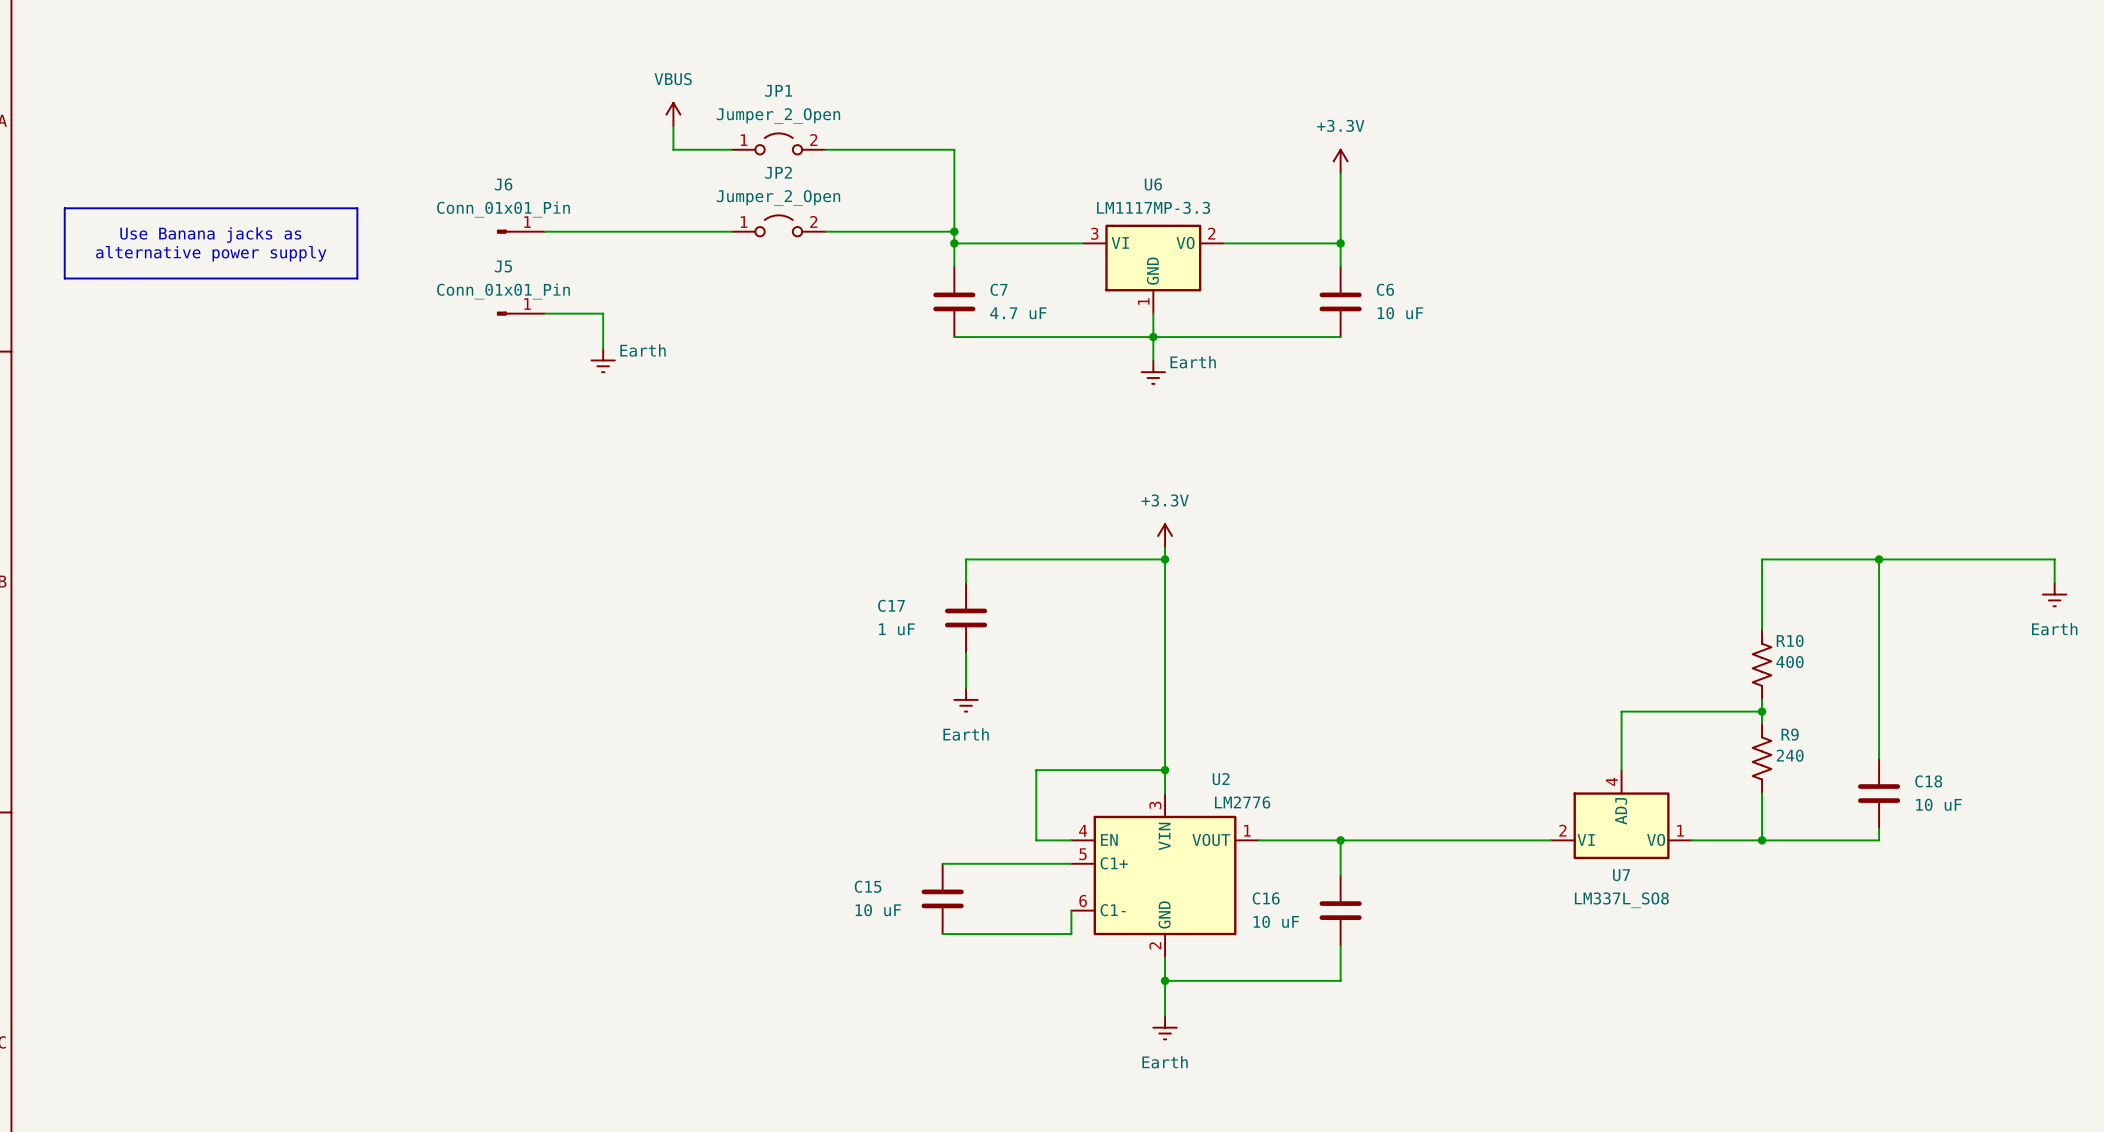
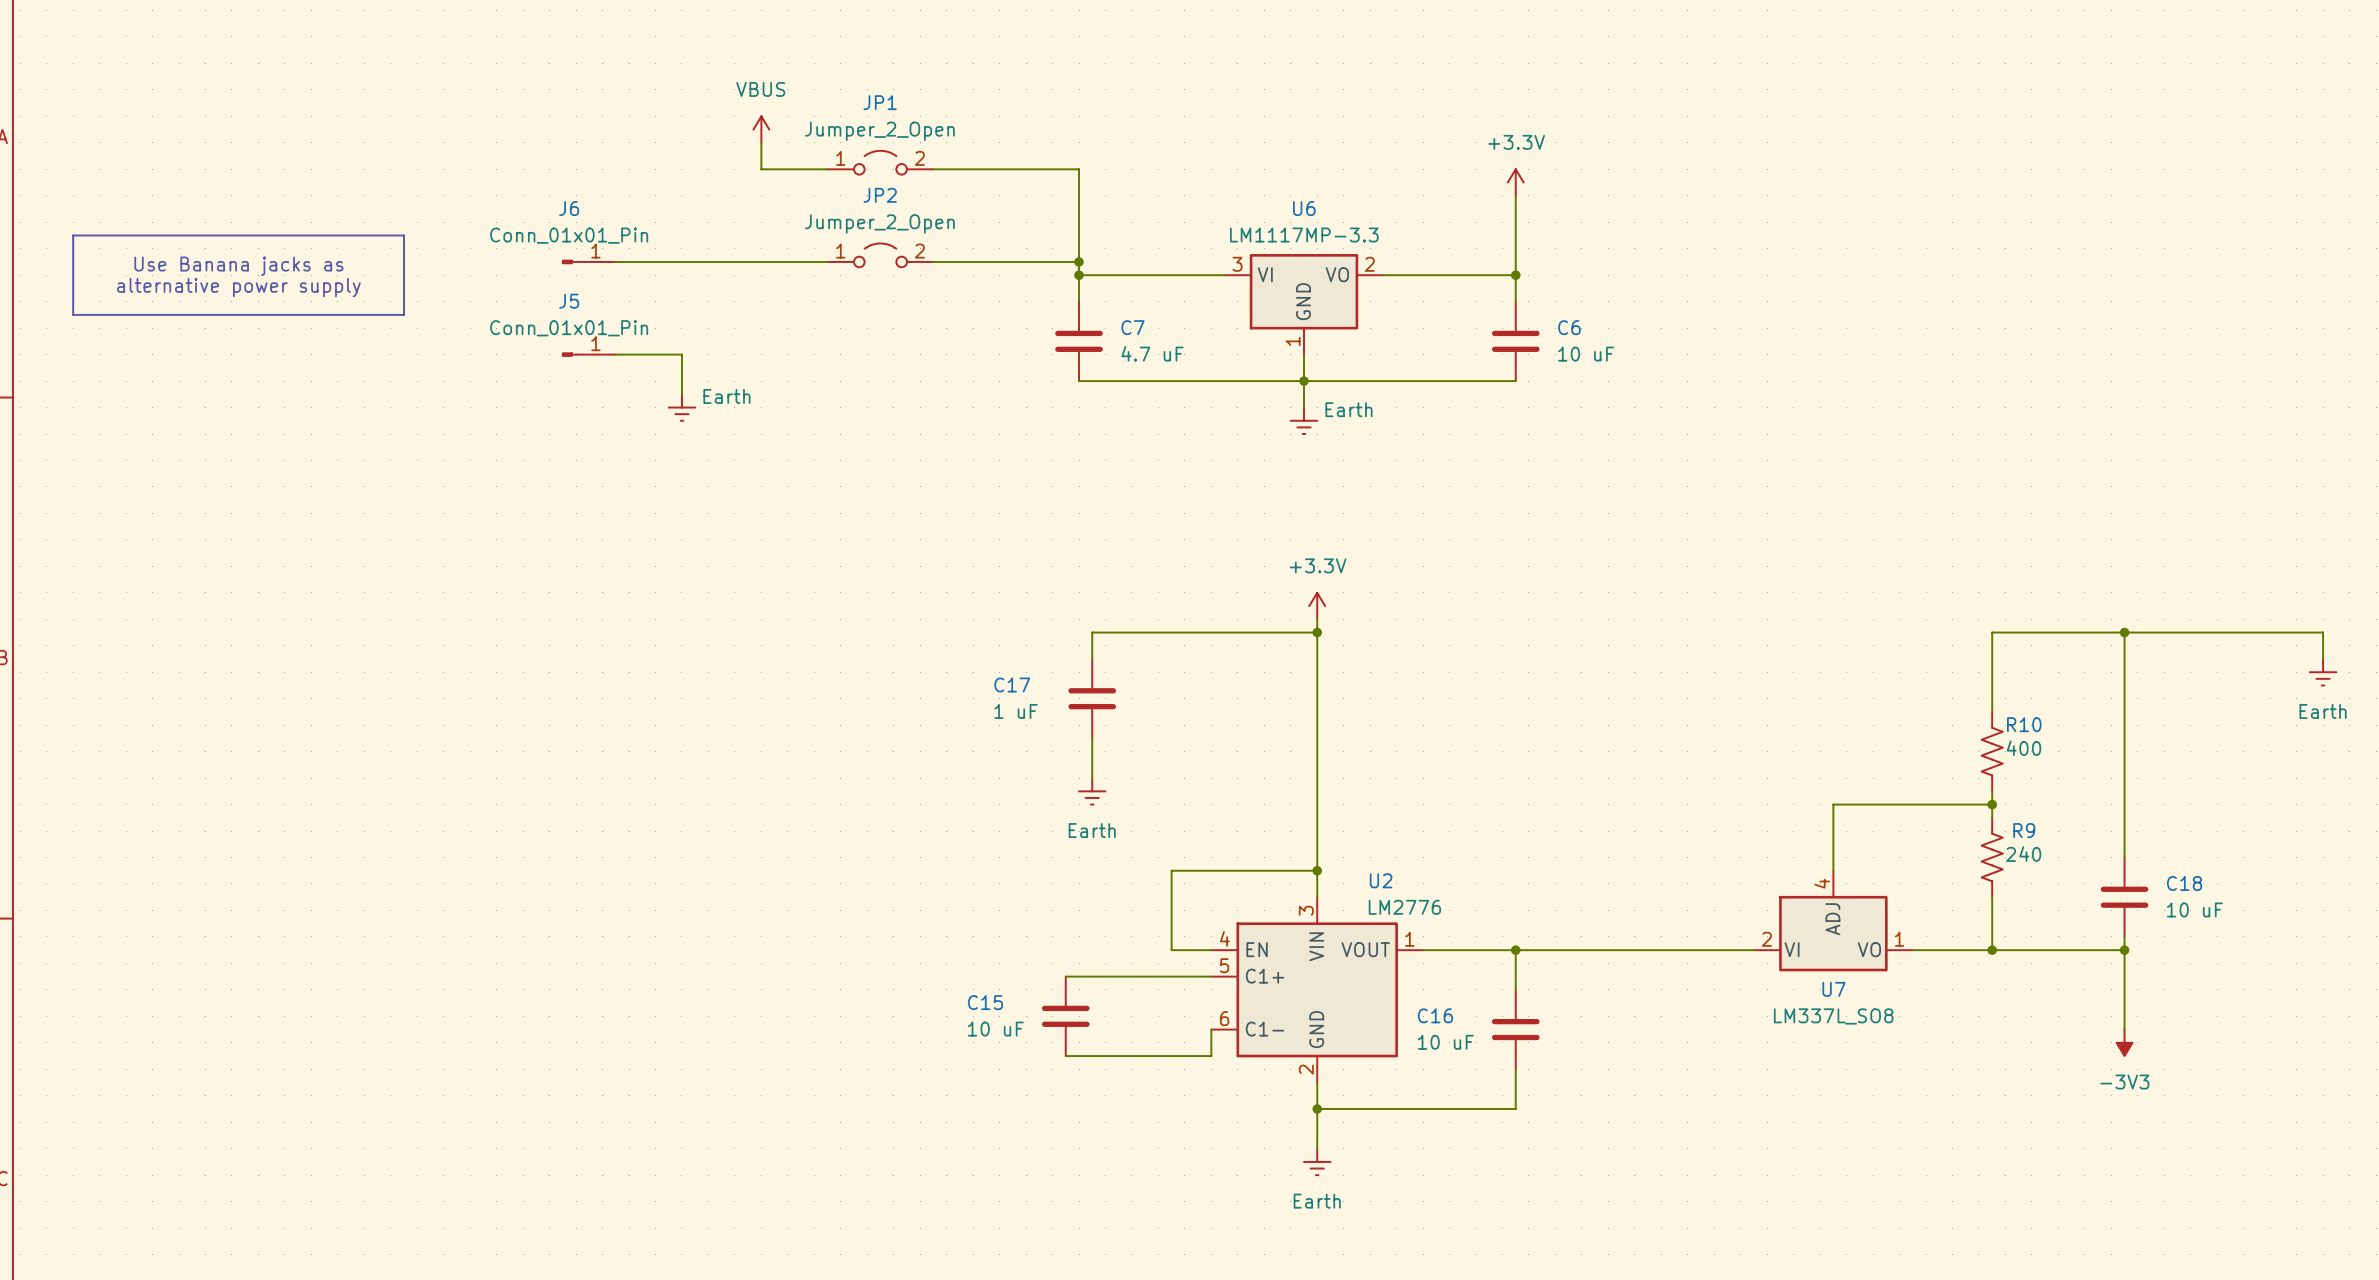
wire: none -> (2124, 950) (2124, 1029)
junction: none -> (2124, 950)
power symbol: none -> -3V3 (2124, 1042)

